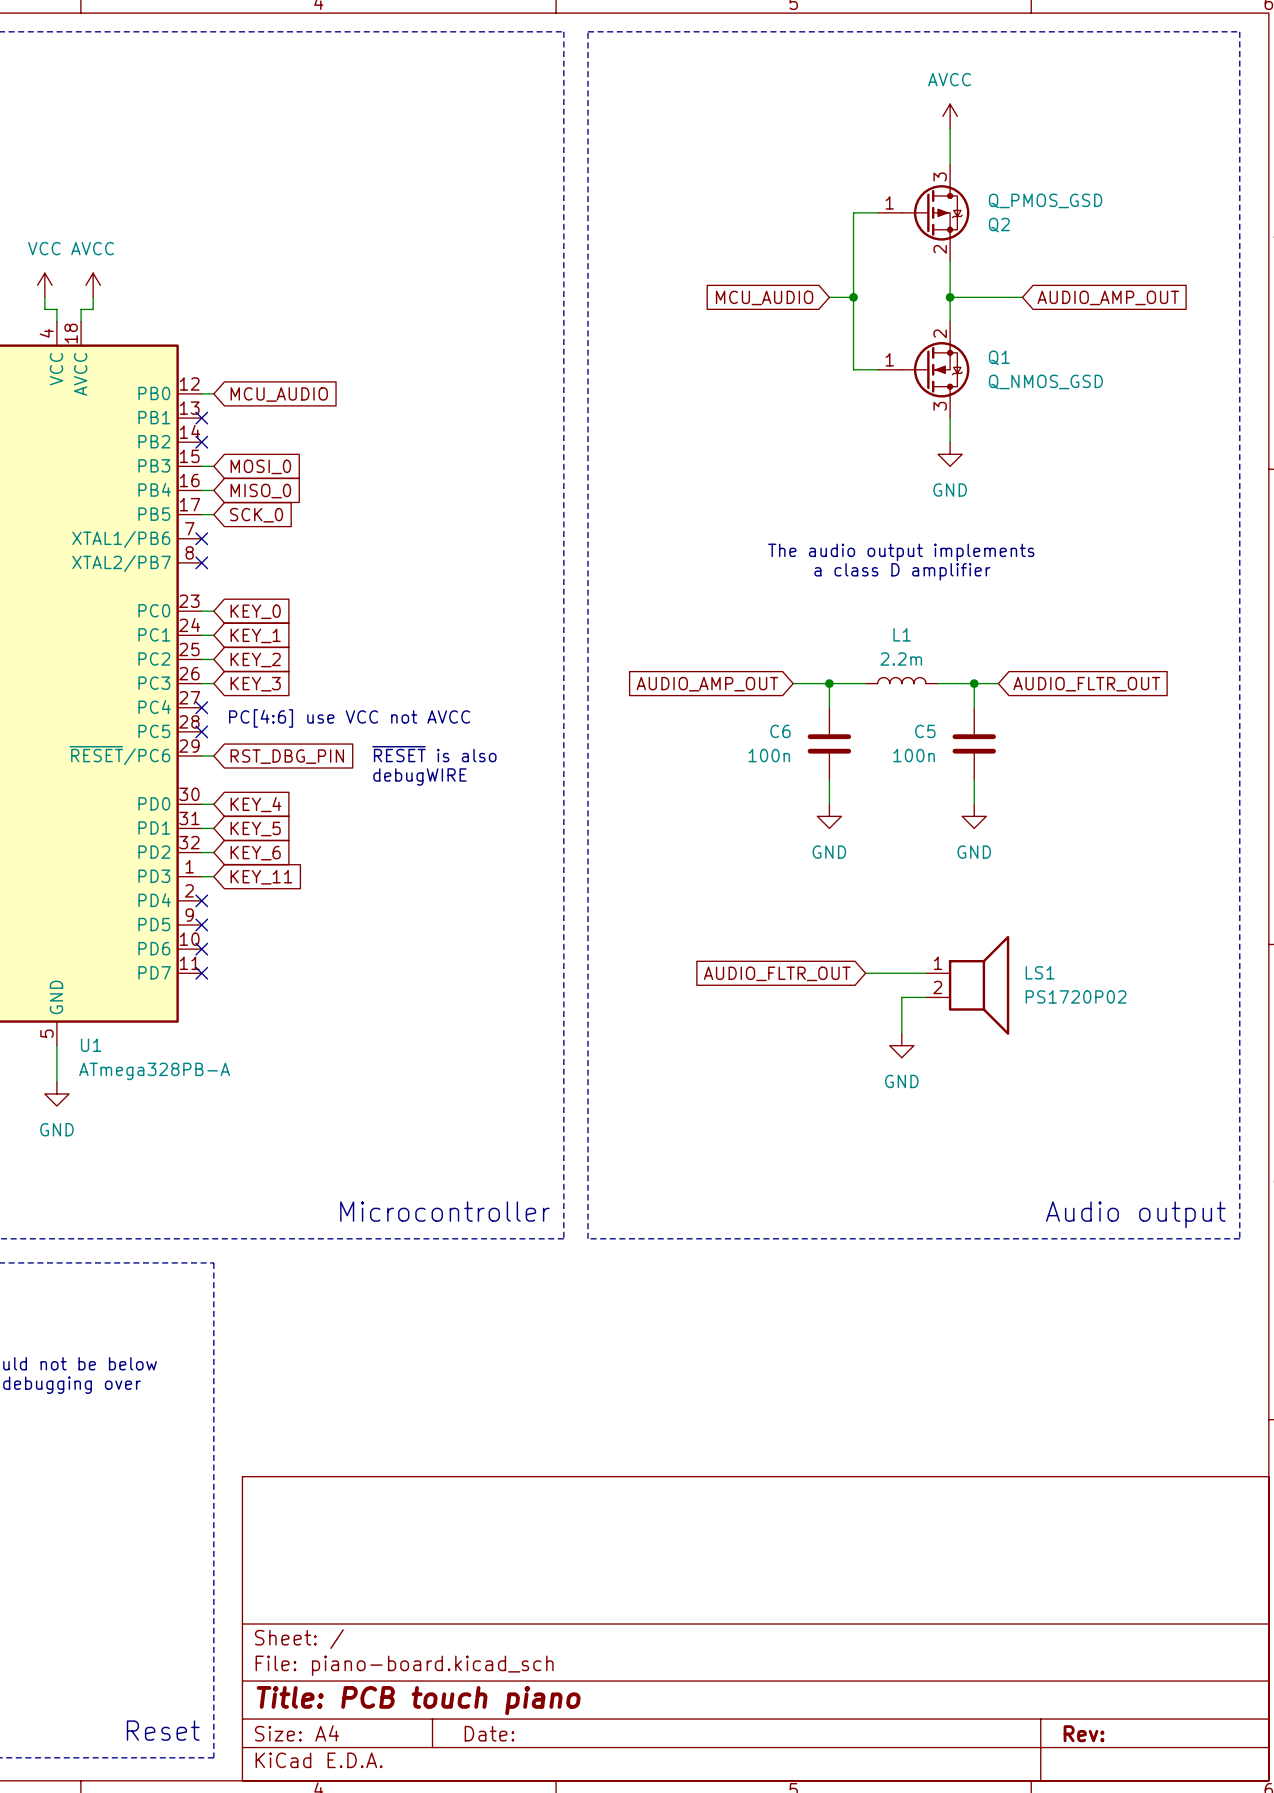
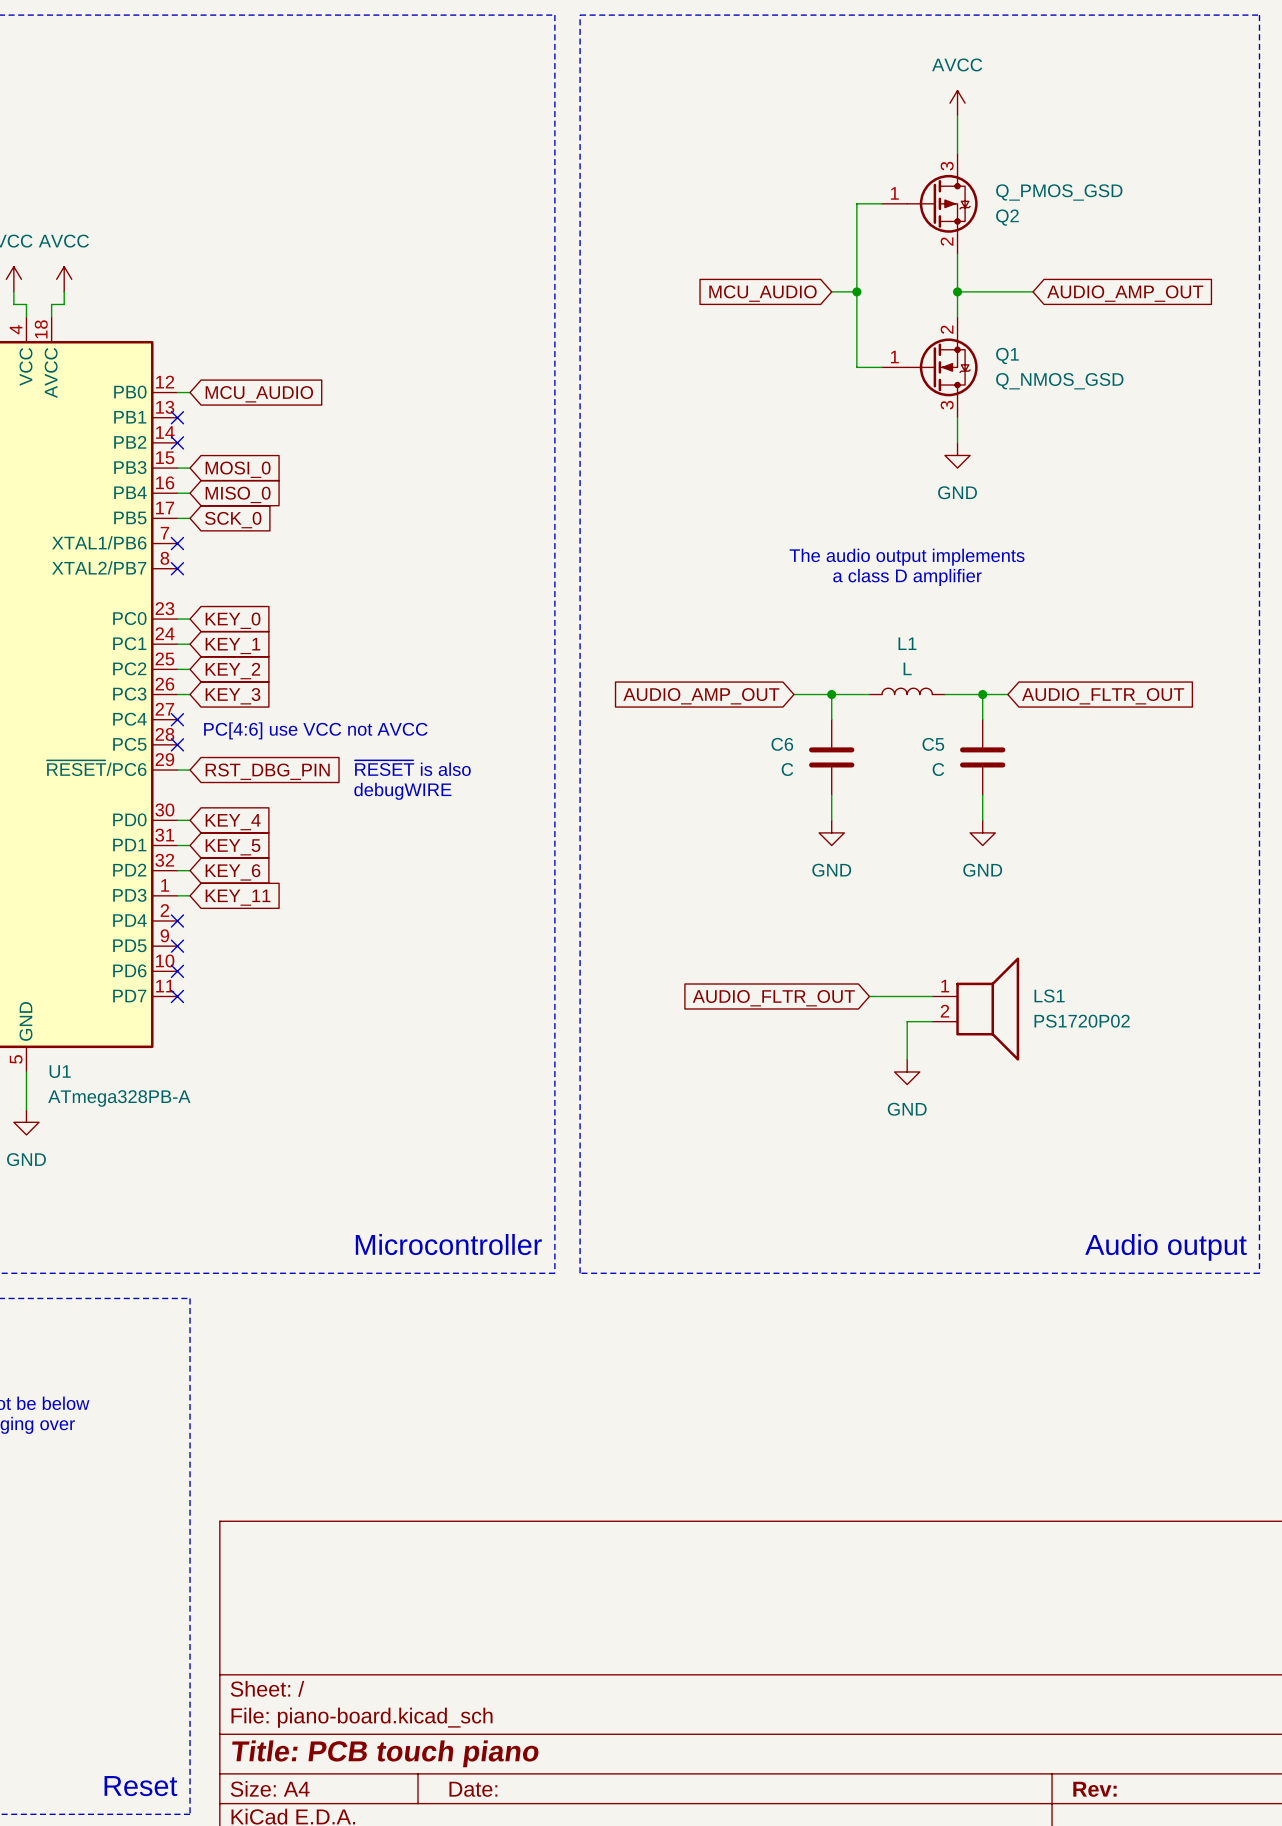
L1 value: 2.2m (901, 659) -> L (907, 668)
C6 value: 100n (769, 755) -> C (787, 769)
C5 value: 100n (914, 755) -> C (938, 769)

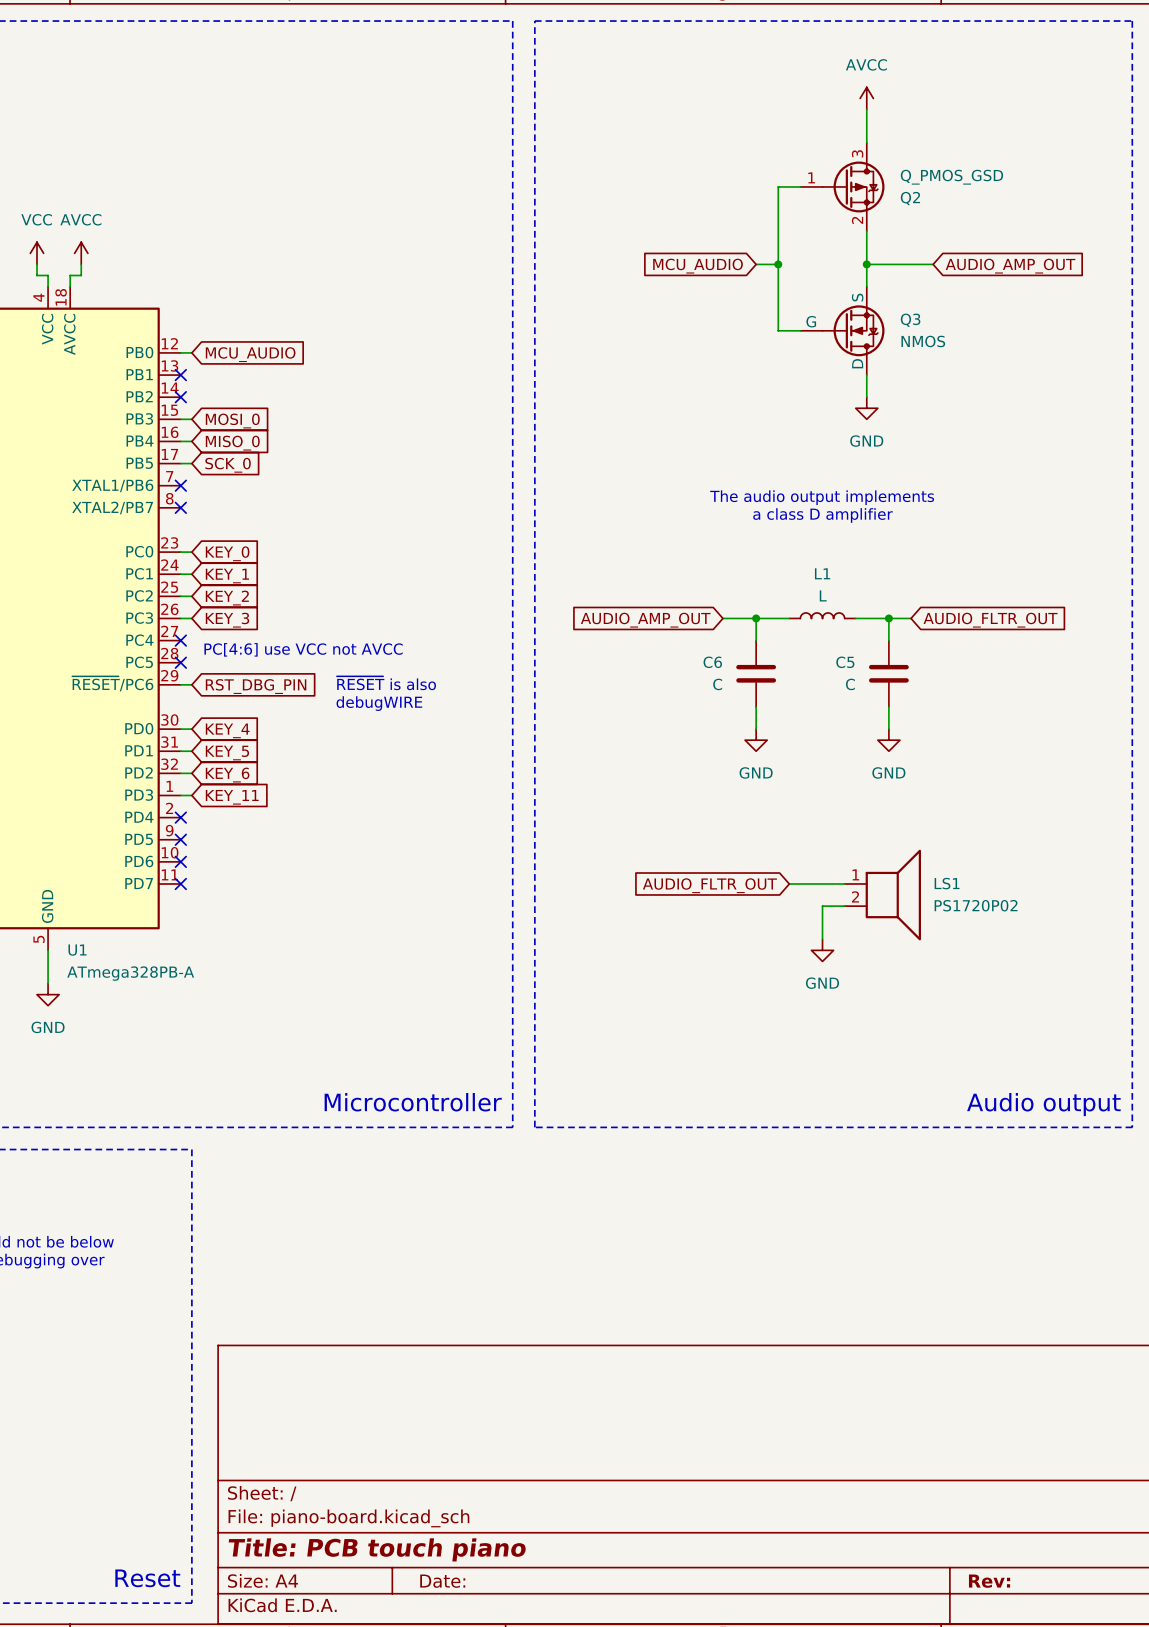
Q1 pin name: none -> S (857, 297)
Q1 pin number: 2 (947, 329) -> none
Q1 name: Q1 (1007, 355) -> Q3 (910, 320)
Q1 pin name: none -> G (811, 321)
Q1 pin number: 1 (894, 357) -> none
Q1 value: Q_NMOS_GSD (1059, 381) -> NMOS (923, 341)
Q1 pin name: none -> D (857, 363)
Q1 pin number: 3 (947, 405) -> none

